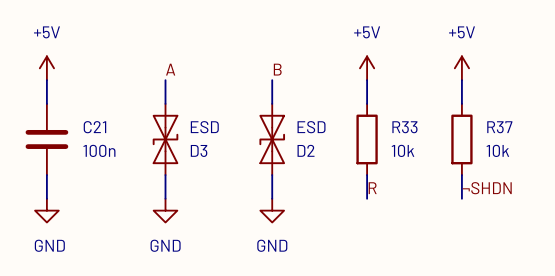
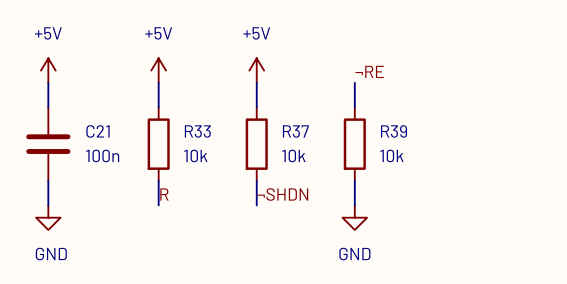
power symbol: none -> +5V (158, 70)
power symbol: none -> +5V (256, 70)
power symbol: +5V (367, 68) -> none
power symbol: +5V (461, 68) -> none
label: A (170, 69) -> none
label: B (277, 69) -> none
label: none -> ¬RE (369, 71)
wire: (165, 80) (165, 103) -> none
wire: (272, 80) (272, 103) -> (158, 82) (158, 107)
wire: (367, 80) (367, 103) -> (256, 82) (256, 107)
wire: (461, 80) (461, 103) -> (354, 82) (354, 107)
D3: ESD (165, 139) -> none
D2: ESD (272, 139) -> none
R39: none -> 10k (354, 144)
R33 position: (367, 139) -> (158, 144)
R37 position: (461, 139) -> (256, 144)
wire: (165, 175) (165, 198) -> none
wire: (272, 175) (272, 198) -> (158, 180) (158, 205)
wire: (367, 175) (367, 198) -> (256, 180) (256, 205)
wire: (461, 175) (461, 198) -> (354, 180) (354, 205)
label position: R (372, 188) -> R (164, 194)
label position: ¬SHDN (487, 188) -> ¬SHDN (282, 194)
power symbol: GND (165, 210) -> none
power symbol position: GND (272, 210) -> GND (354, 217)

